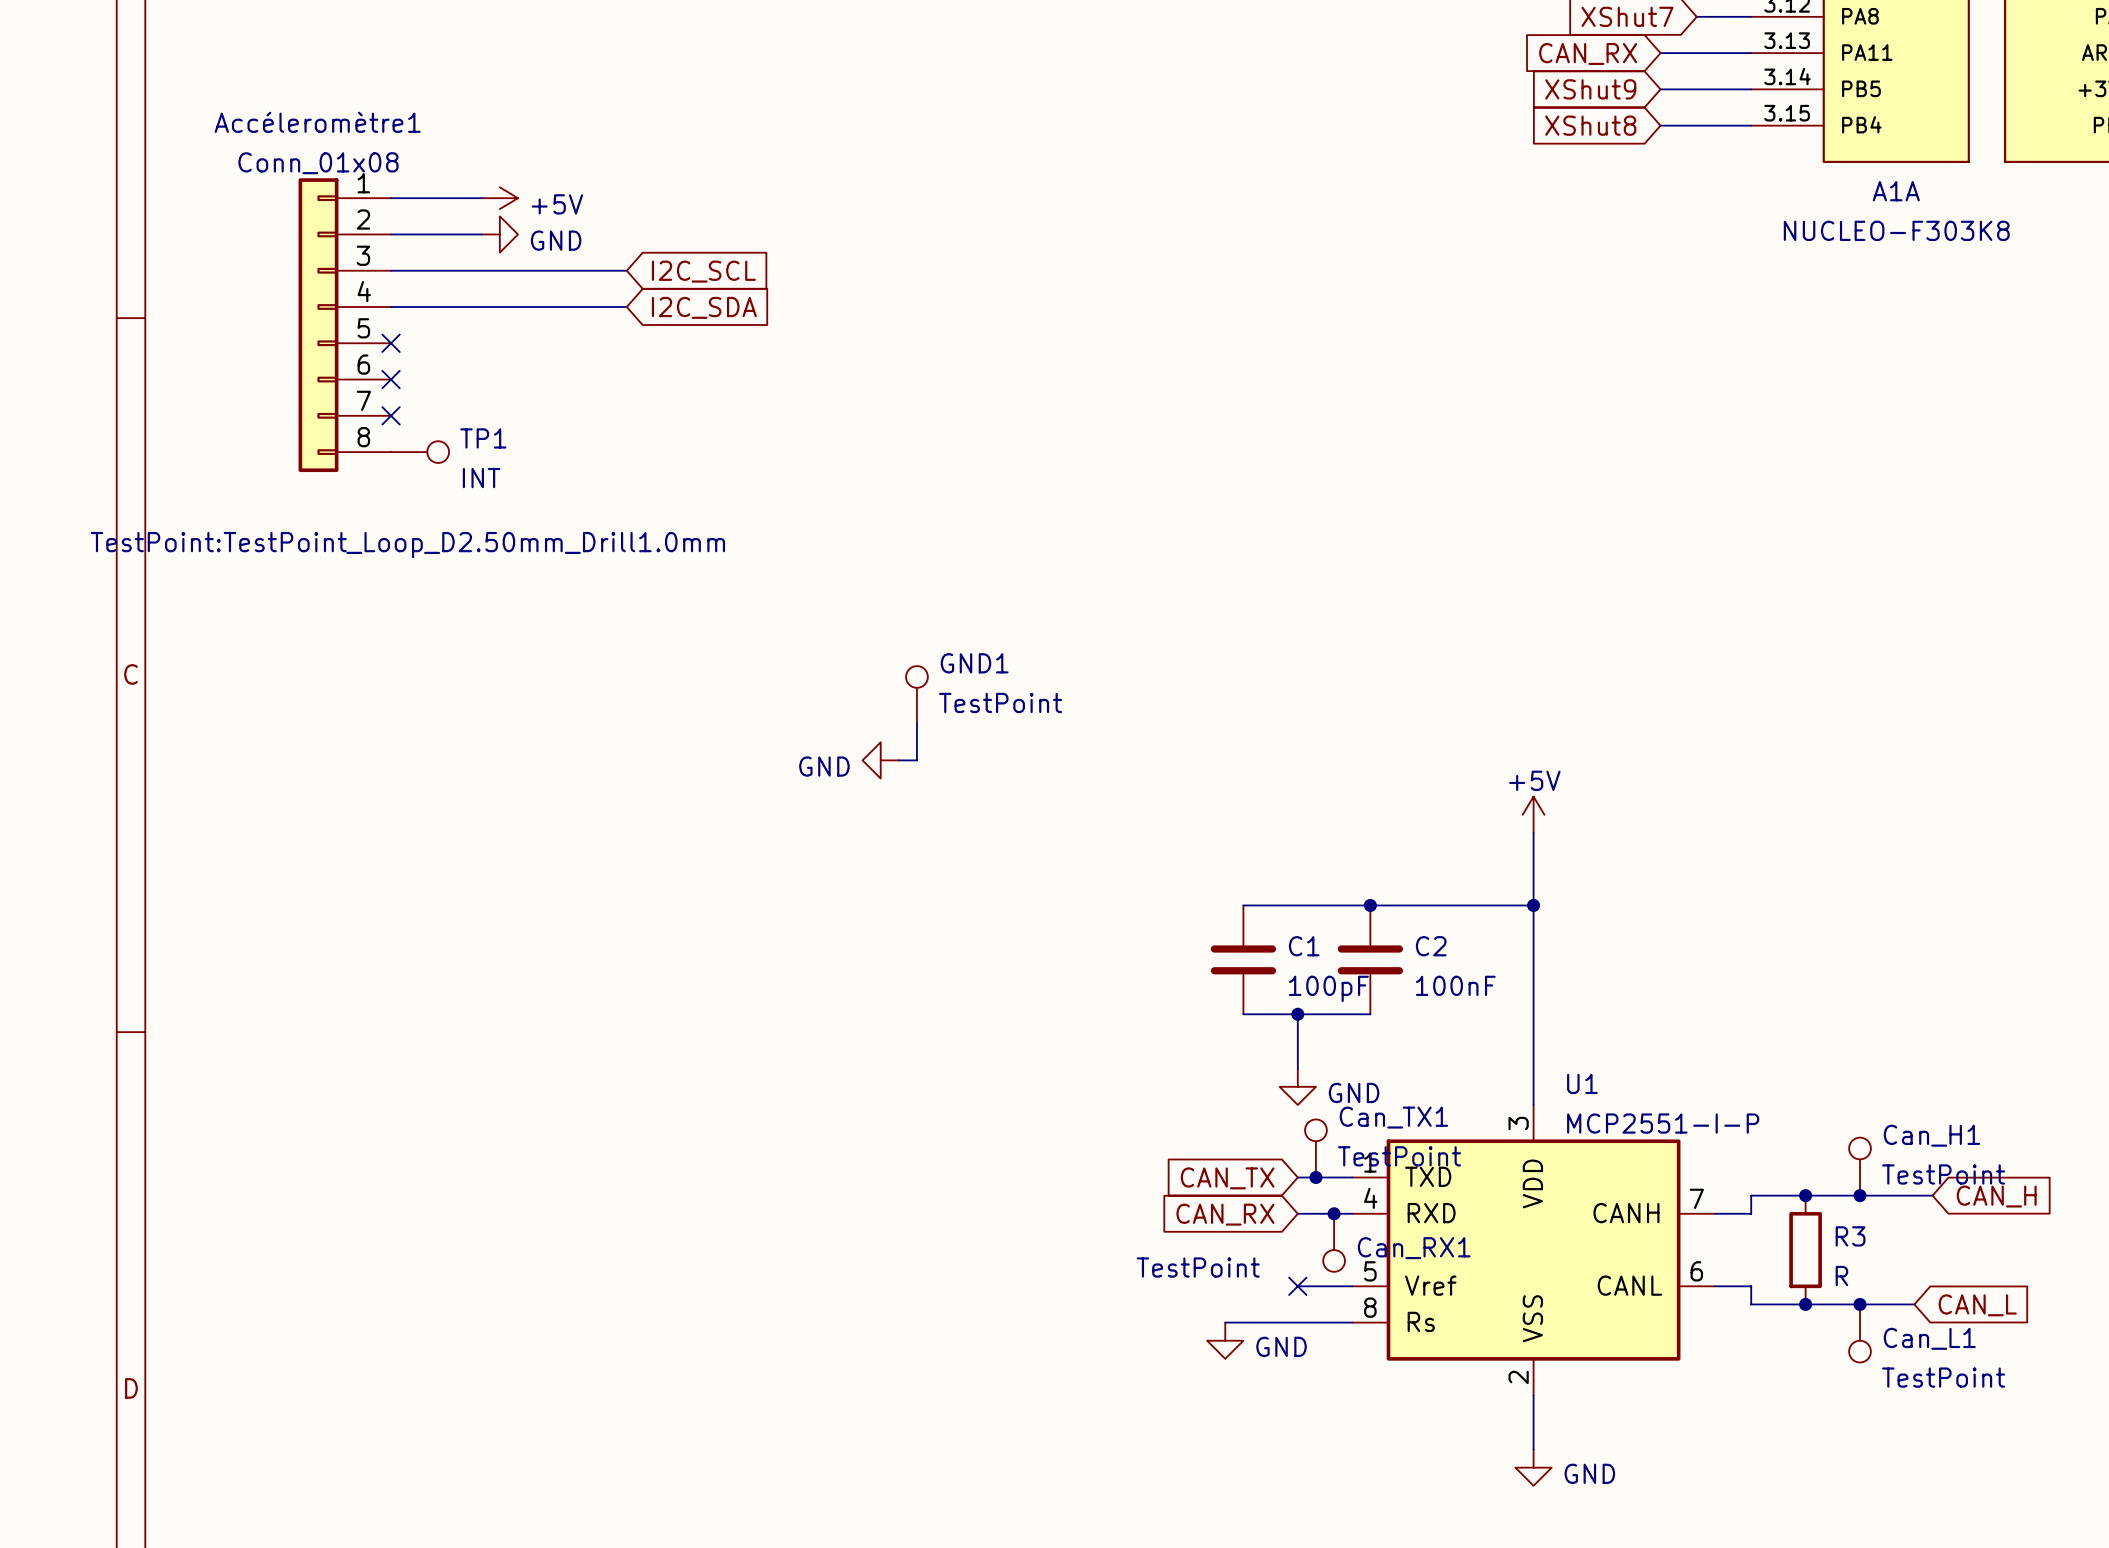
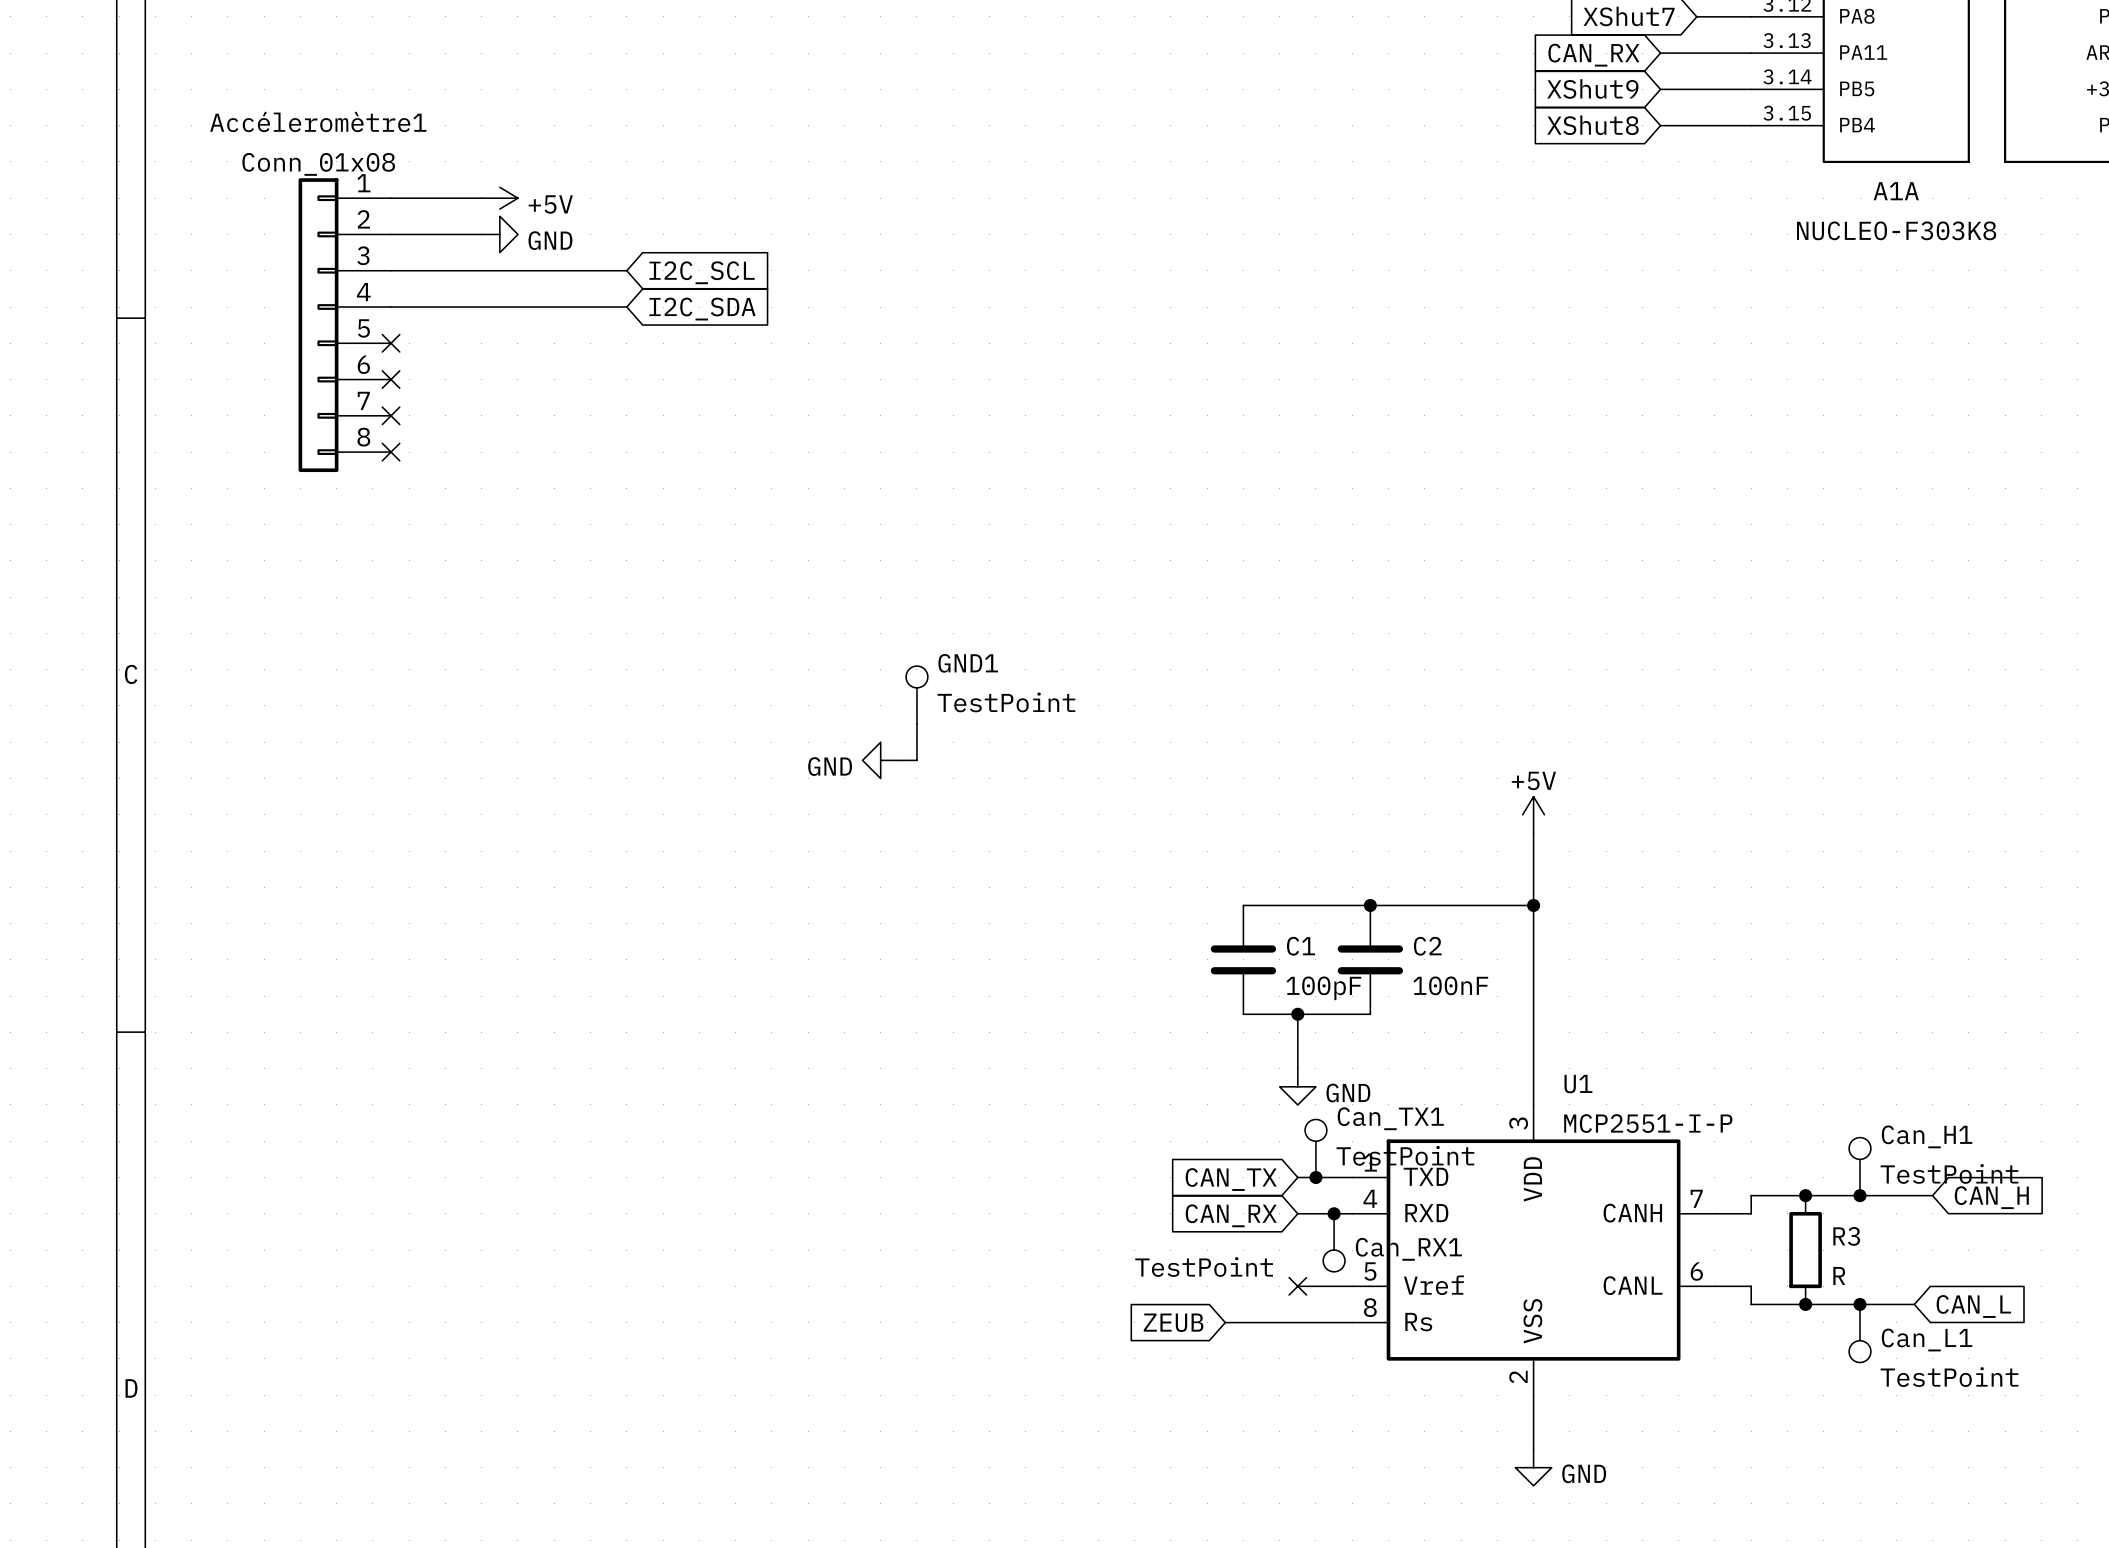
no-connect mark: none -> (391, 452)
TP1: INT (420, 452) -> none
global label: none -> ZEUB (1173, 1322)
power symbol: GND (1225, 1340) -> none

